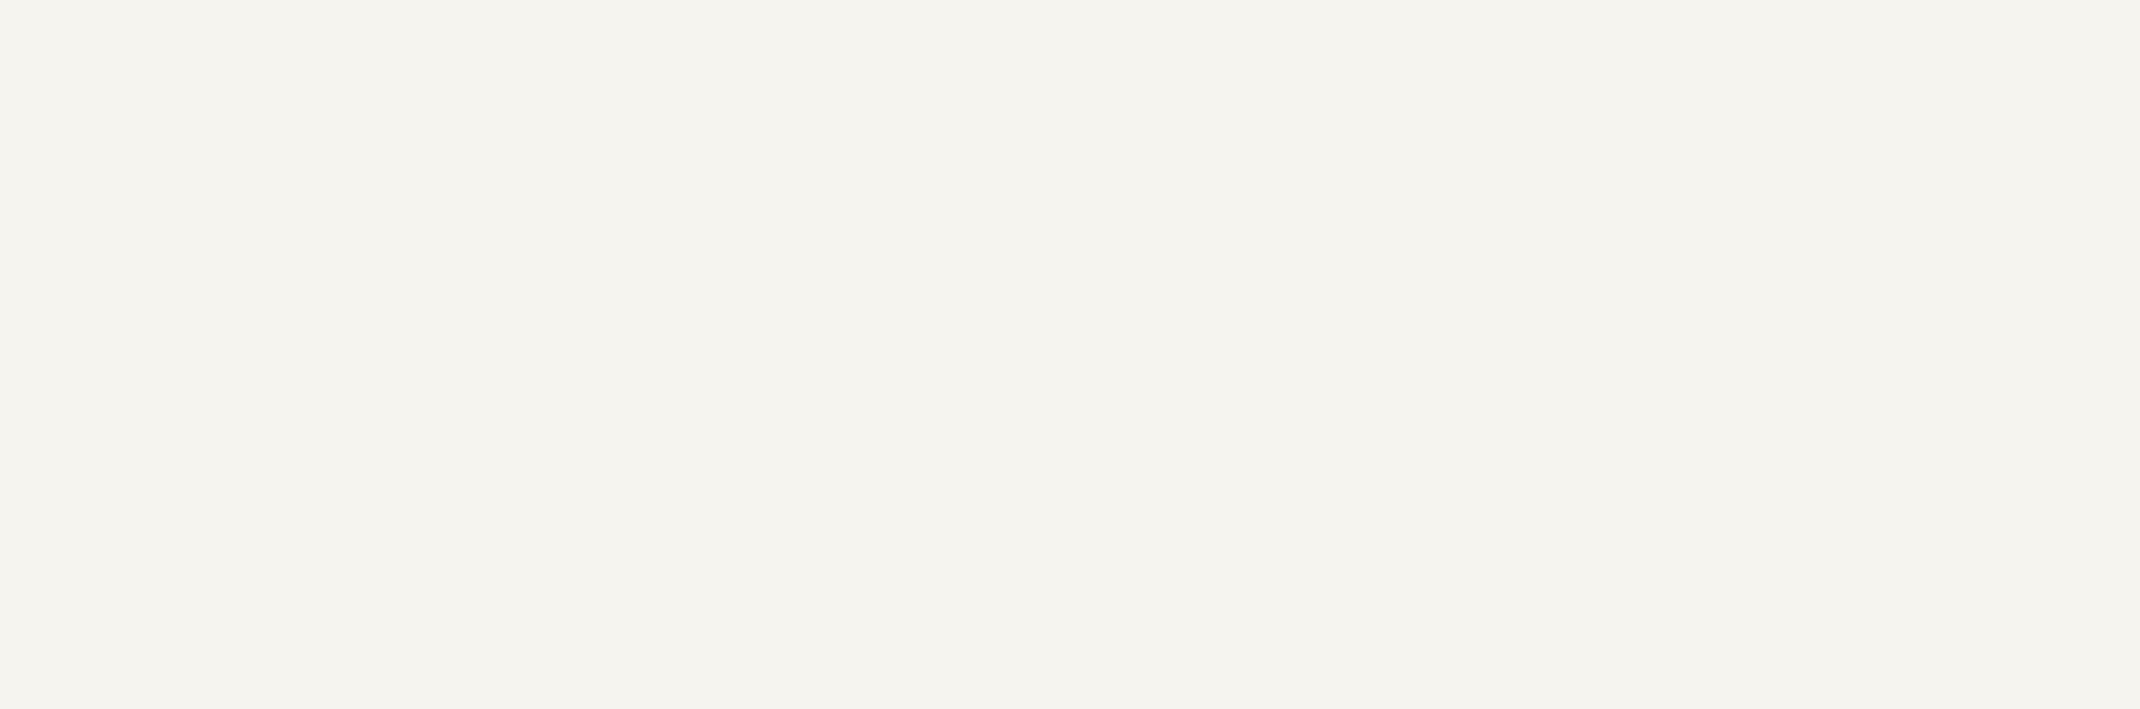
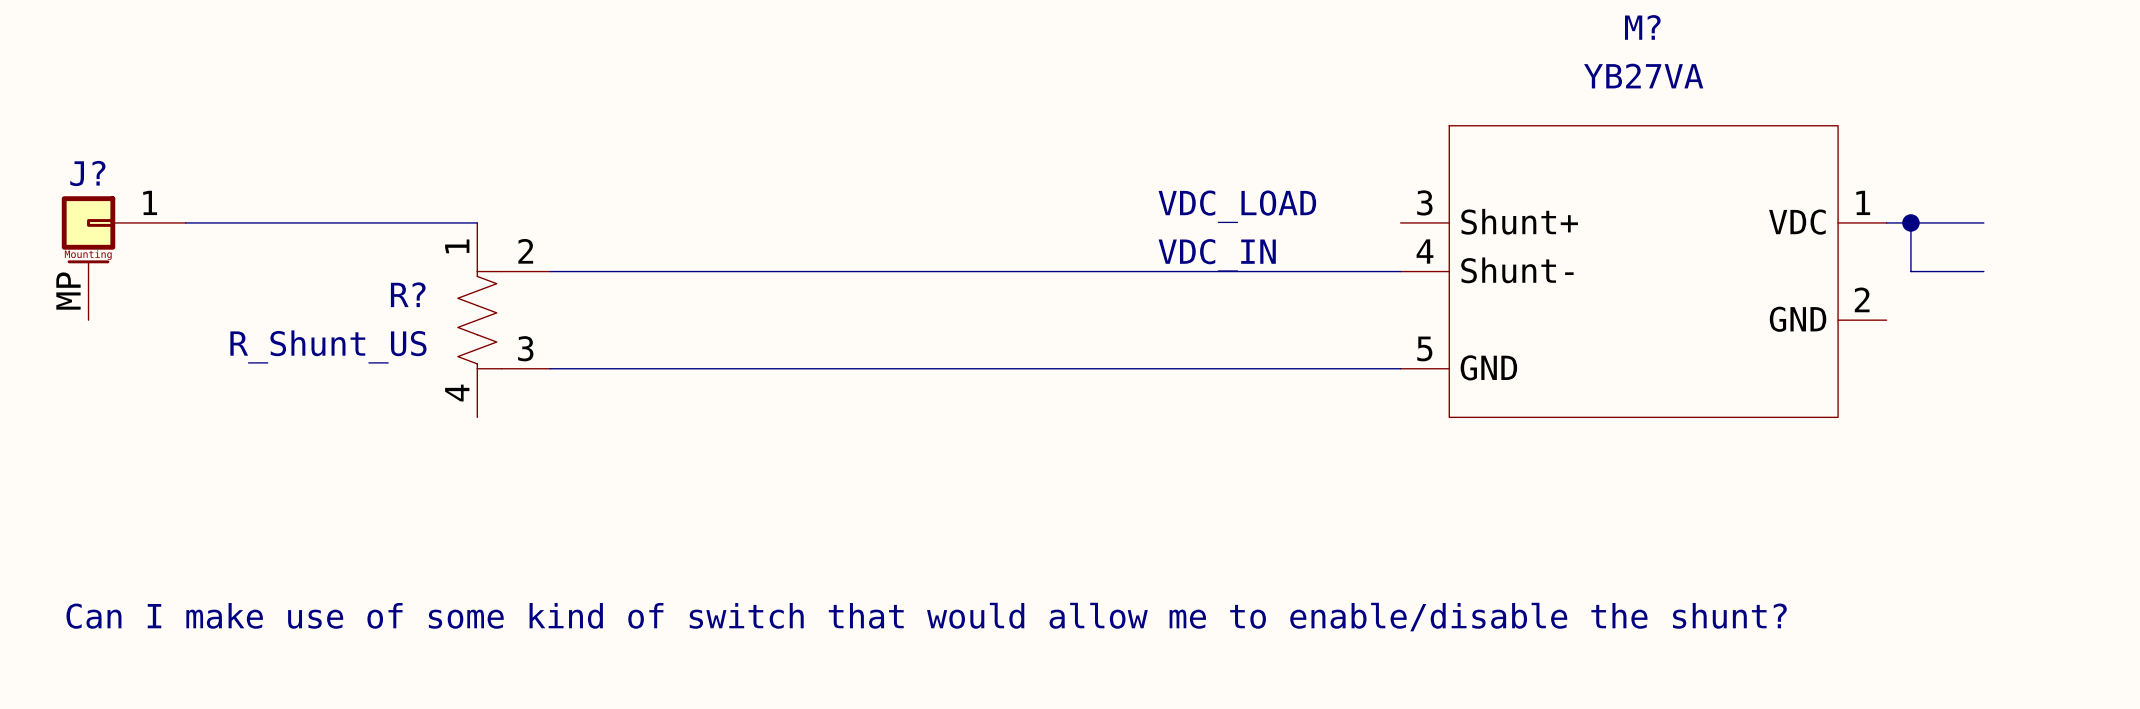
text: none -> VDC_LOAD (1237, 206)
wire: none -> (185, 222) (477, 222)
wire: none -> (1886, 222) (1983, 222)
wire: none -> (1910, 222) (1910, 271) (1983, 271)
junction: none -> (1910, 222)
text: none -> VDC_IN (1217, 255)
J?: none -> (123, 258)
wire: none -> (550, 271) (1400, 271)
M?: none -> YB27VA (1643, 271)
R?: none -> R_Shunt_US (504, 320)
wire: none -> (550, 368) (1400, 368)
text: none -> Can I make use of some kind of switch that would allow me to enable/disable the shunt? (926, 617)

